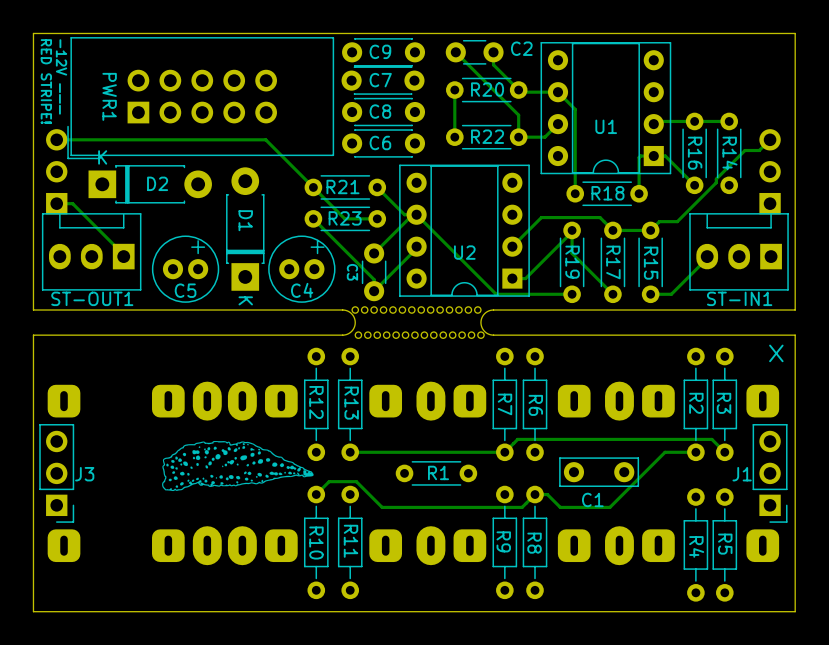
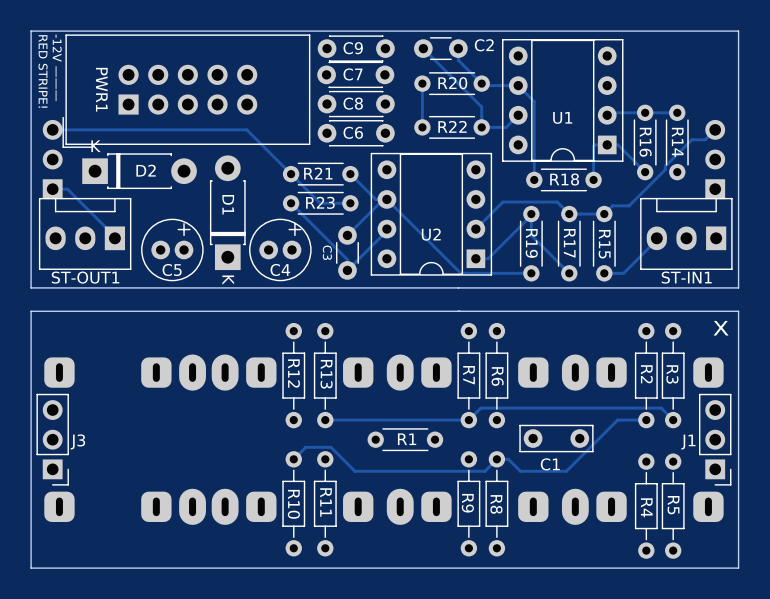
board edge: (342, 310) (351, 313) (355, 322) (351, 331) (342, 335) -> (458, 311) (318, 311)
part: (355, 310) -> none
part: (364, 310) -> none
part: (374, 310) -> none
part: (383, 310) -> none
part: (392, 310) -> none
part: (402, 310) -> none
part: (411, 310) -> none
part: (421, 310) -> none
part: (430, 310) -> none
part: (440, 310) -> none
part: (449, 310) -> none
part: (458, 310) -> none
part: (468, 310) -> none
part: (477, 310) -> none
board edge: (493, 310) (484, 313) (480, 322) (484, 331) (493, 335) -> (458, 287) (318, 287)
part: (358, 335) -> none
part: (367, 335) -> none
part: (377, 335) -> none
part: (386, 335) -> none
part: (396, 335) -> none
part: (405, 335) -> none
part: (414, 335) -> none
part: (424, 335) -> none
part: (433, 335) -> none
part: (443, 335) -> none
part: (452, 335) -> none
part: (462, 335) -> none
part: (471, 335) -> none
part: (480, 335) -> none
drawing: [162, 441, 314, 492] -> none

